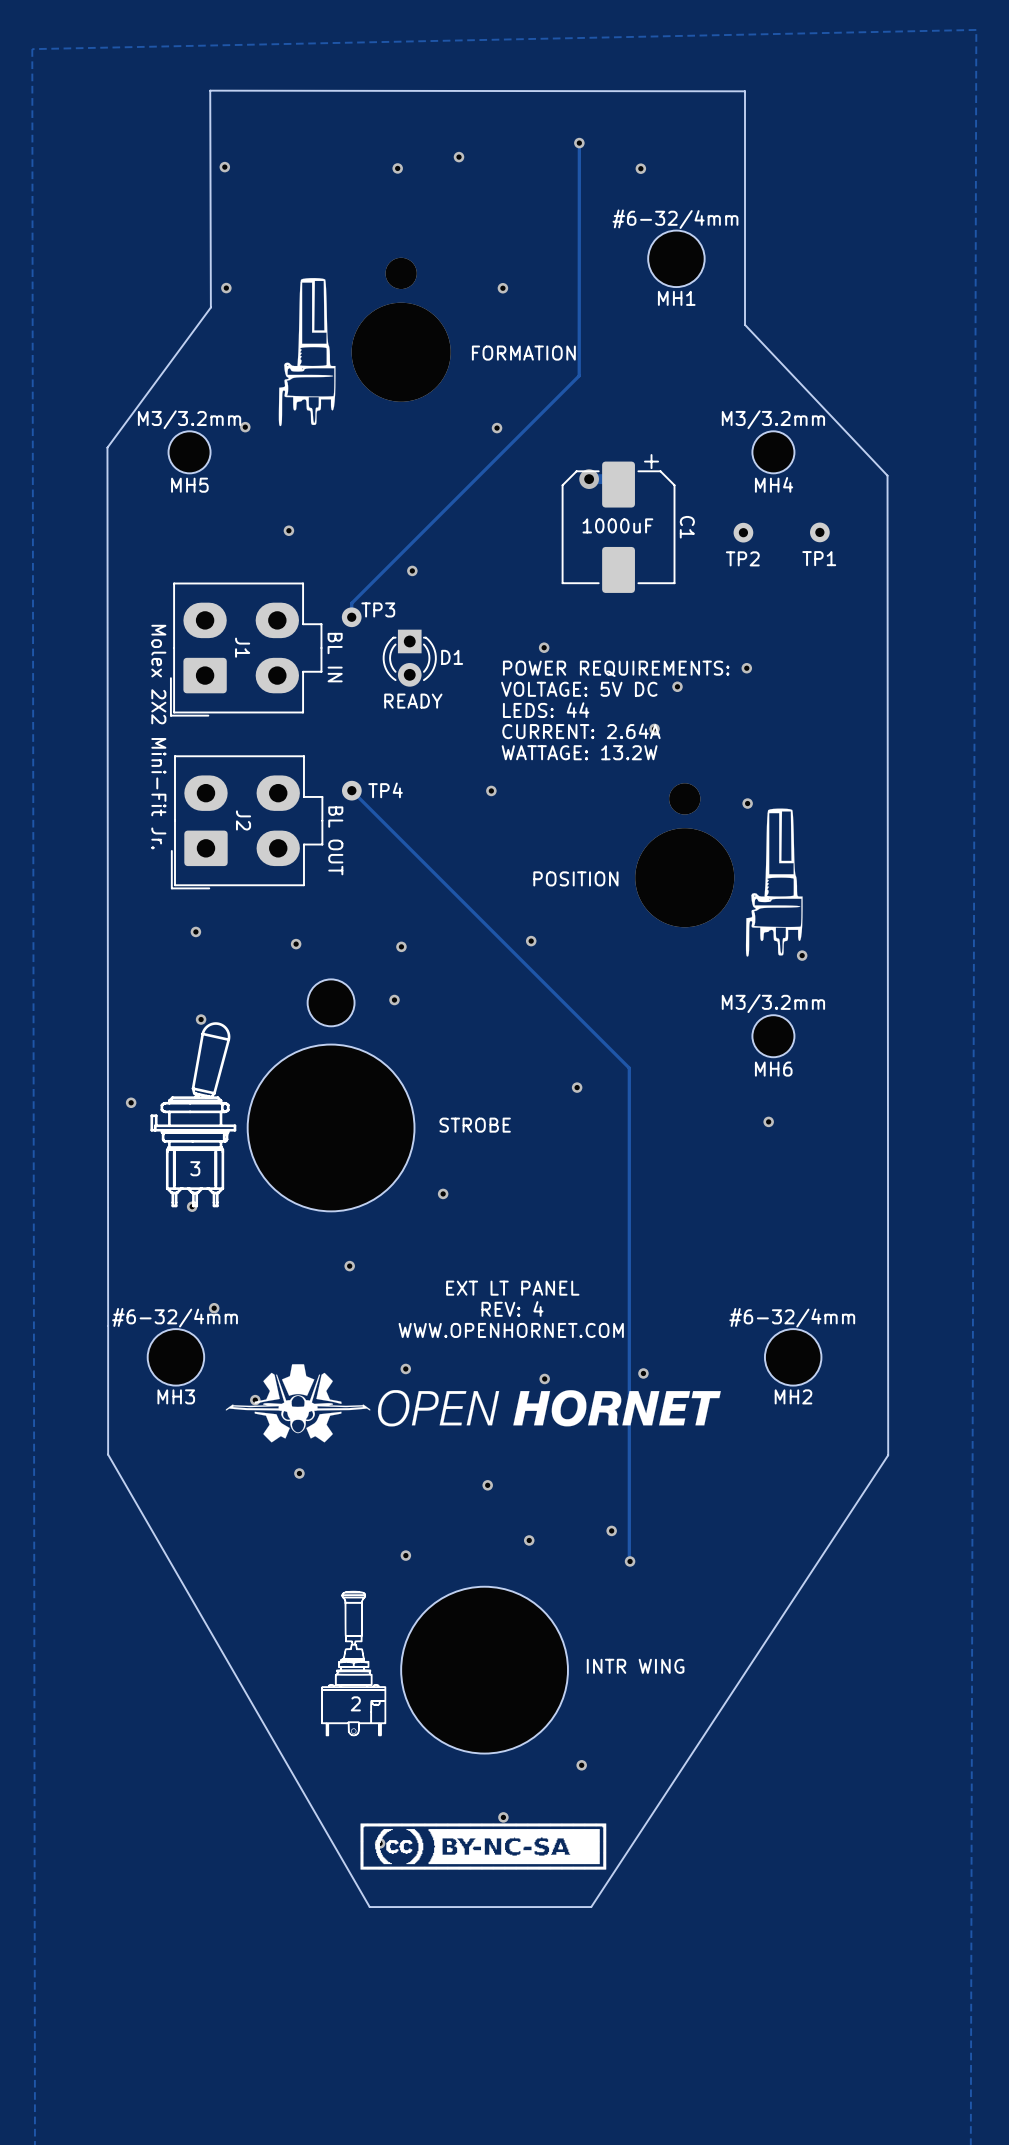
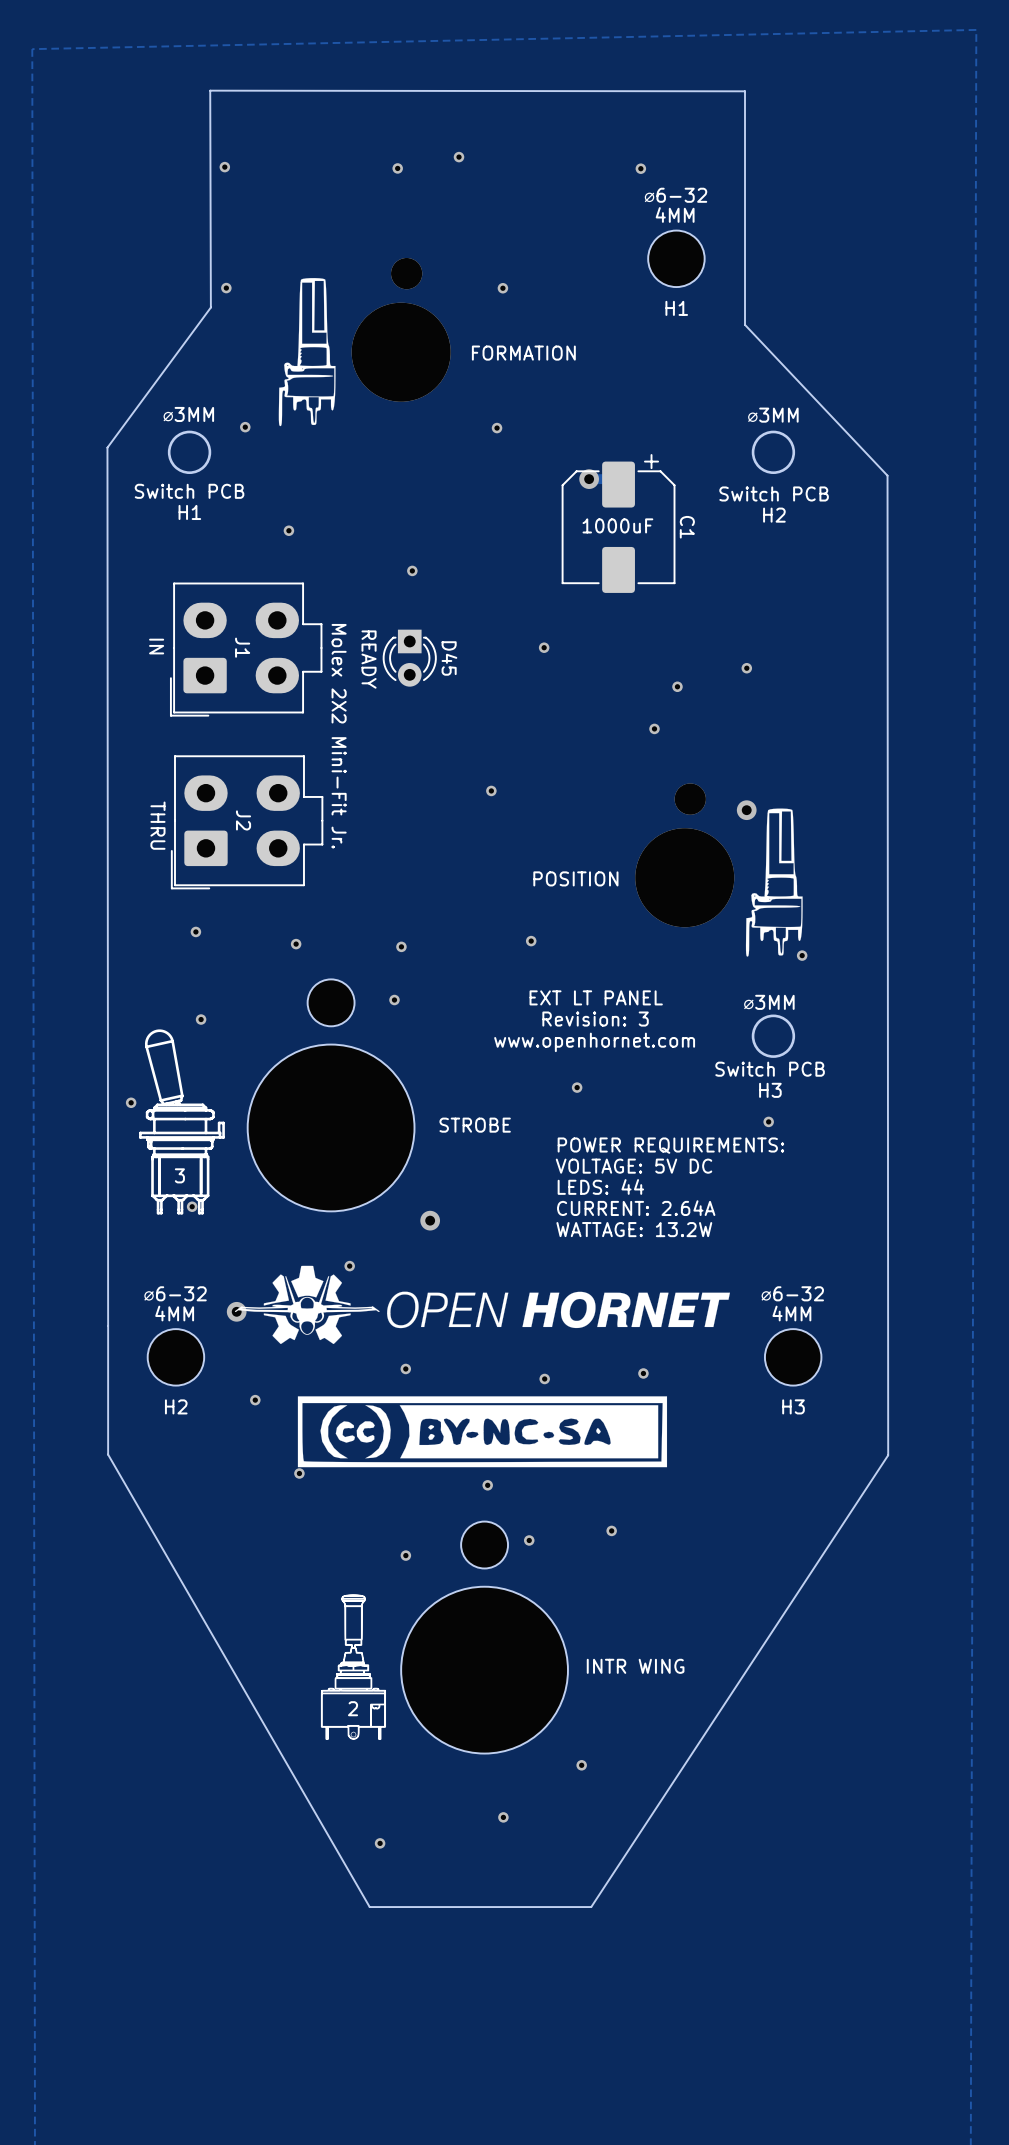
track: (579, 143) (579, 375) (351, 603) (351, 617) -> none
via: (579, 143) -> none
MH1 side: bottom (676, 258) -> top (676, 258)
part rotation: 0° (401, 329) -> 4° clockwise (401, 329)
text: none -> ⌀3MM (188, 414)
text: none -> ⌀3MM (772, 415)
round board edge: none -> [167, 430, 212, 475]
round board edge: none -> [751, 430, 796, 475]
MH5: (189, 452) -> none
MH4: (773, 452) -> none
text: none -> Switch PCB (189, 491)
text: none -> Switch PCB (774, 493)
text: none -> H1 (189, 512)
text: none -> H2 (774, 515)
part: (743, 532) -> none
part: (819, 532) -> none
part: (351, 617) -> none
text: none -> IN (156, 646)
J1 text: BL IN (335, 657) -> none
D1 name: D1 (452, 657) -> D45 (449, 658)
text: POWER REQUIREMENTS: (616, 668) -> none
text: VOLTAGE: 5V DC (579, 689) -> none
text rotation: 0° (413, 701) -> 90° clockwise (369, 659)
text: LEDS: 44 (546, 710) -> none
text: CURRENT: 2.64A (581, 731) -> none
text position: Molex 2X2 Mini-Fit Jr. (158, 737) -> Molex 2X2 Mini-Fit Jr. (339, 736)
text: WATTAGE: 13.2W (579, 752) -> none
track: (351, 790) (629, 1068) (630, 1561) -> none
part: (351, 790) -> none
via size: [742, 798, 753, 809] -> [736, 800, 757, 821]
text: none -> THRU (157, 825)
J2 text: BL OUT (335, 840) -> none
part rotation: 0° (684, 855) -> 4° clockwise (684, 855)
text: none -> ⌀3MM (768, 1002)
round board edge: none -> [751, 1014, 796, 1058]
text: none -> Revision: 3 (595, 1019)
drawing: [150, 1022, 237, 1208] -> none
drawing: none -> [139, 1029, 225, 1215]
MH6: (773, 1036) -> none
text: none -> www.openhornet.com (594, 1042)
text: none -> Switch PCB (770, 1069)
text: none -> H3 (770, 1090)
text: none -> POWER REQUIREMENTS: (670, 1145)
text: none -> VOLTAGE: 5V DC (634, 1166)
text: none -> 3 (179, 1175)
text: none -> LEDS: 44 (600, 1186)
via: (443, 1193) -> none
text: none -> CURRENT: 2.64A (636, 1208)
via: none -> (430, 1220)
text: none -> WATTAGE: 13.2W (634, 1229)
text position: EXT LT PANEL (512, 1288) -> EXT LT PANEL (596, 997)
via: (214, 1308) -> none
text: REV: 4 (512, 1308) -> none
via: none -> (236, 1311)
text: WWW.OPENHORNET.COM (511, 1330) -> none
MH3 side: bottom (175, 1357) -> top (175, 1357)
MH2 side: bottom (793, 1357) -> top (793, 1357)
drawing: none -> [297, 1396, 668, 1468]
drawing position: (473, 1403) -> (482, 1304)
via: (630, 1561) -> none
drawing shape: [321, 1590, 387, 1737] -> [320, 1594, 387, 1740]
part: none -> (484, 1637)
drawing: [360, 1823, 607, 1870] -> none

